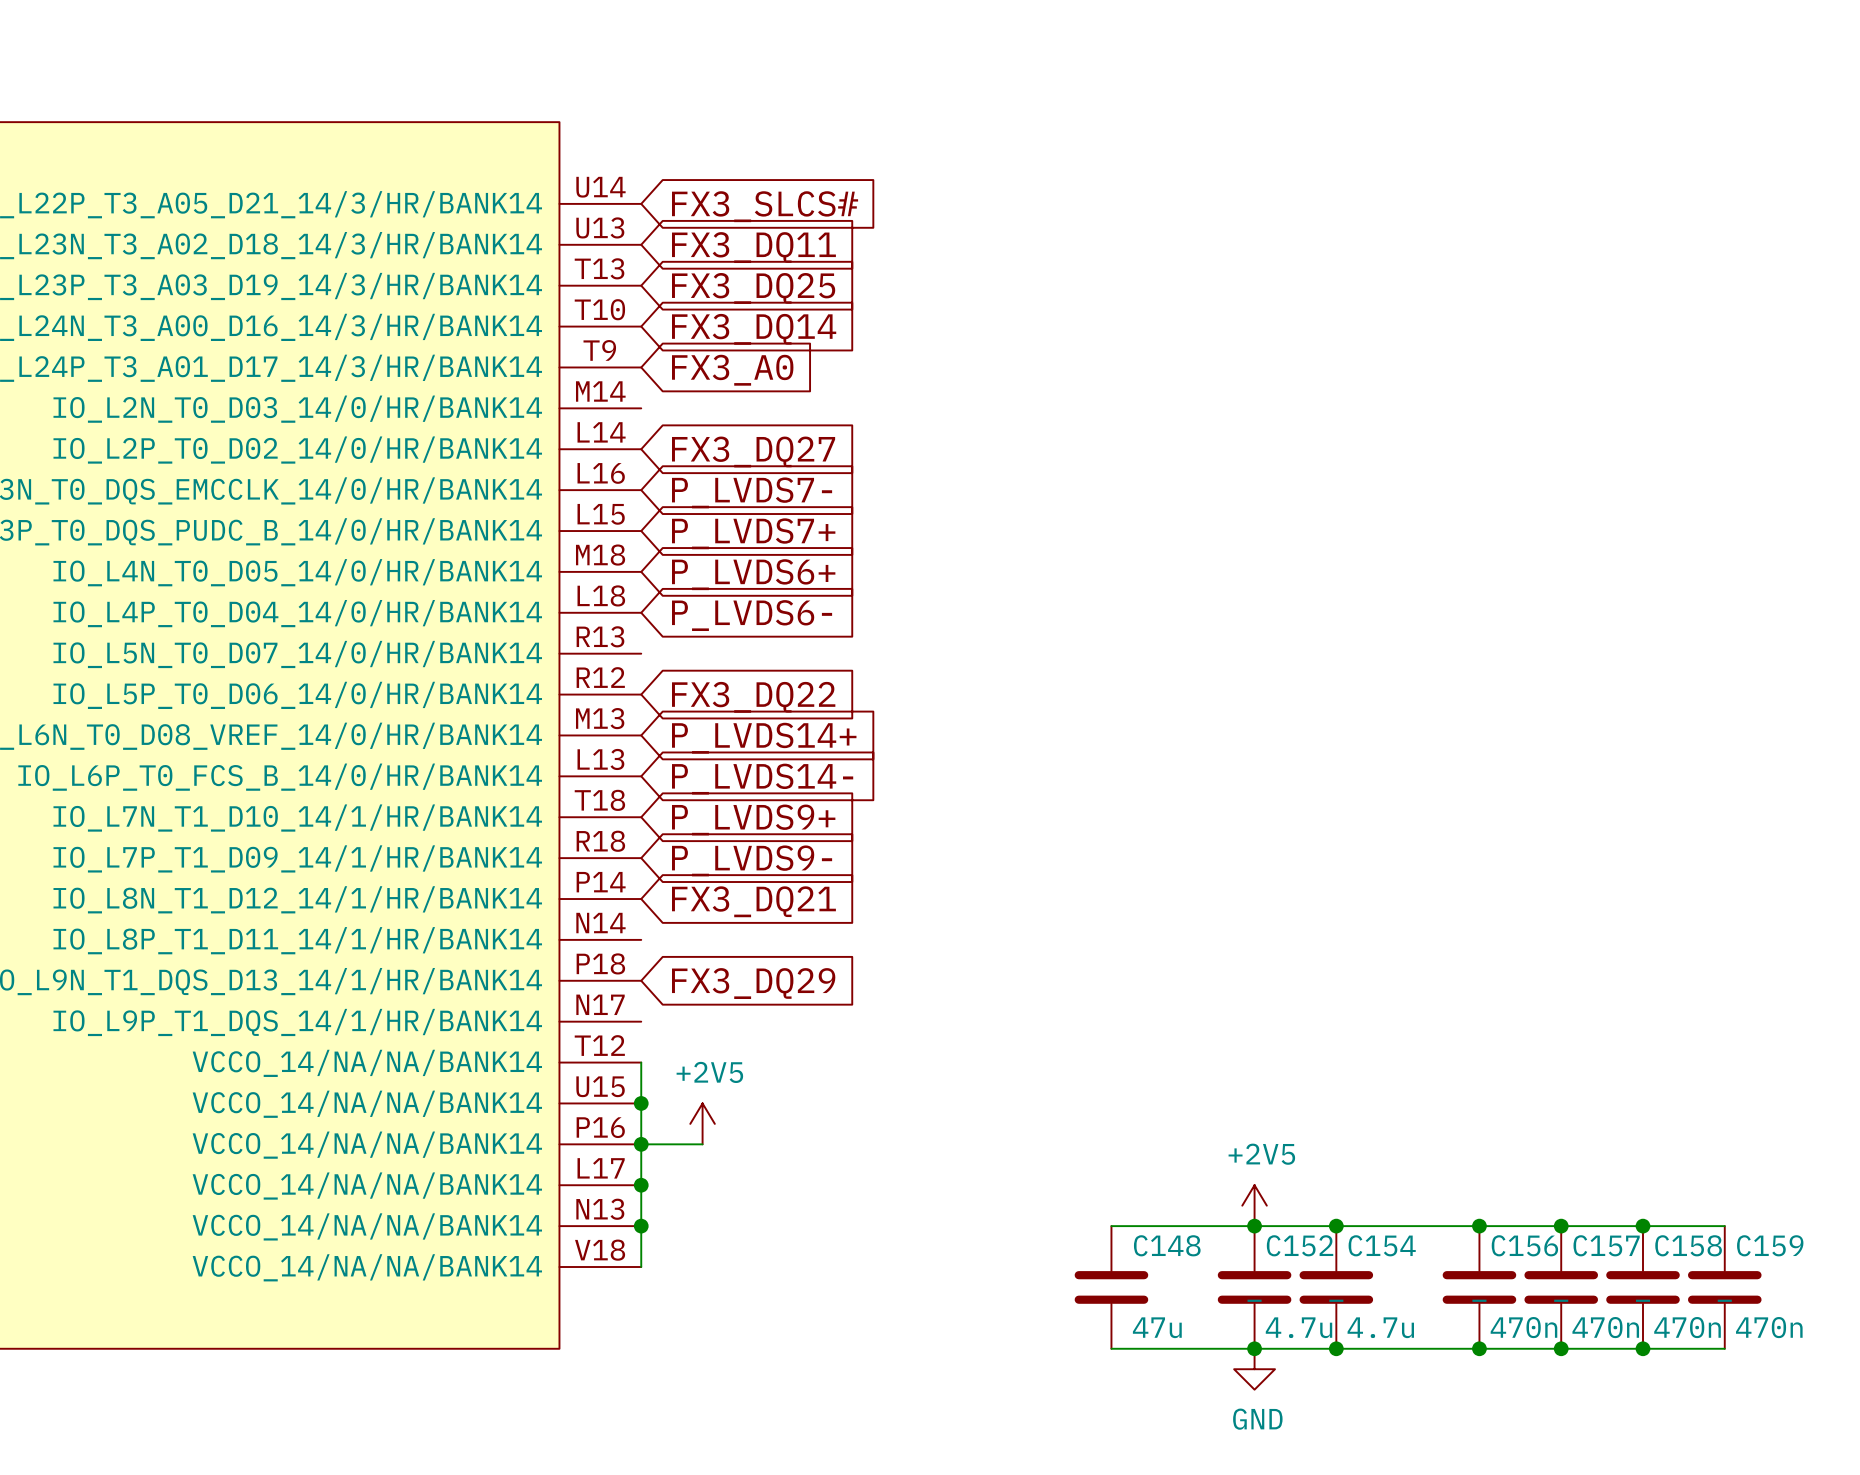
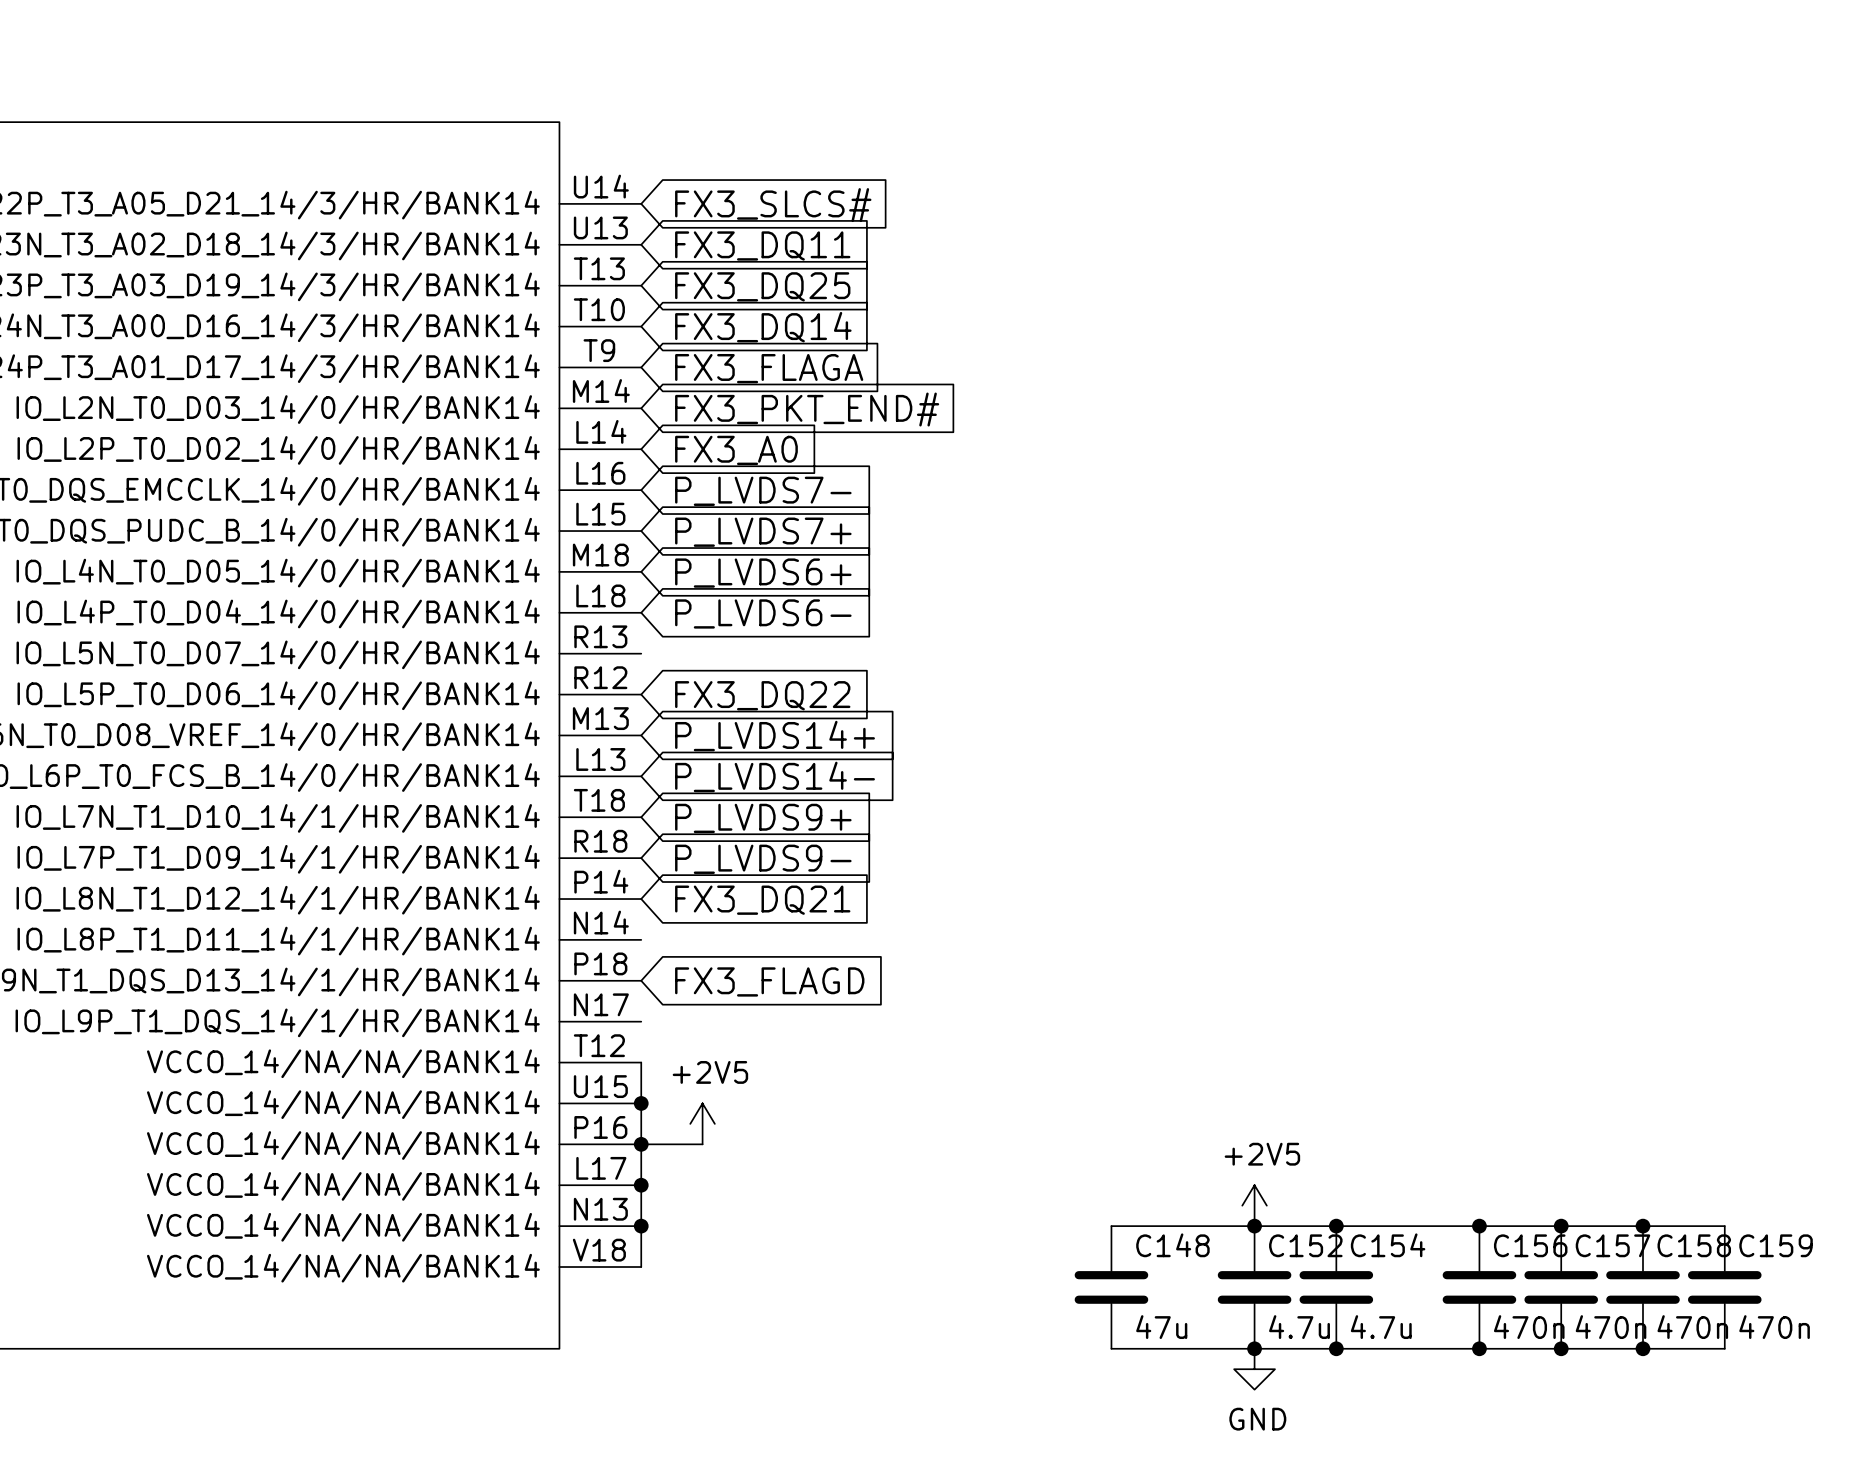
global label: FX3_A0 (732, 370) -> FX3_FLAGA (769, 368)
global label: none -> FX3_PKT_END# (807, 409)
global label: FX3_DQ27 (753, 452) -> FX3_A0 (736, 450)
global label: FX3_DQ29 (753, 983) -> FX3_FLAGD (769, 981)

